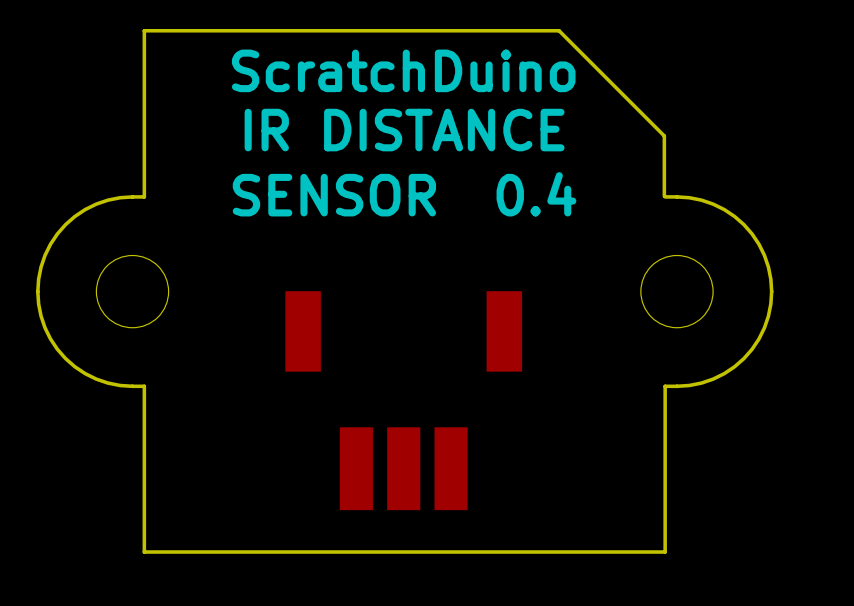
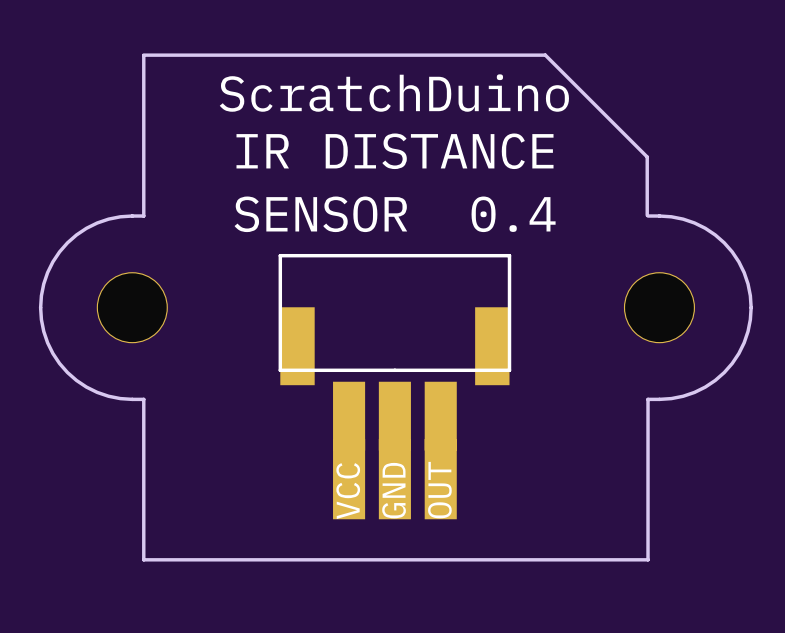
part: none -> (394, 352)

